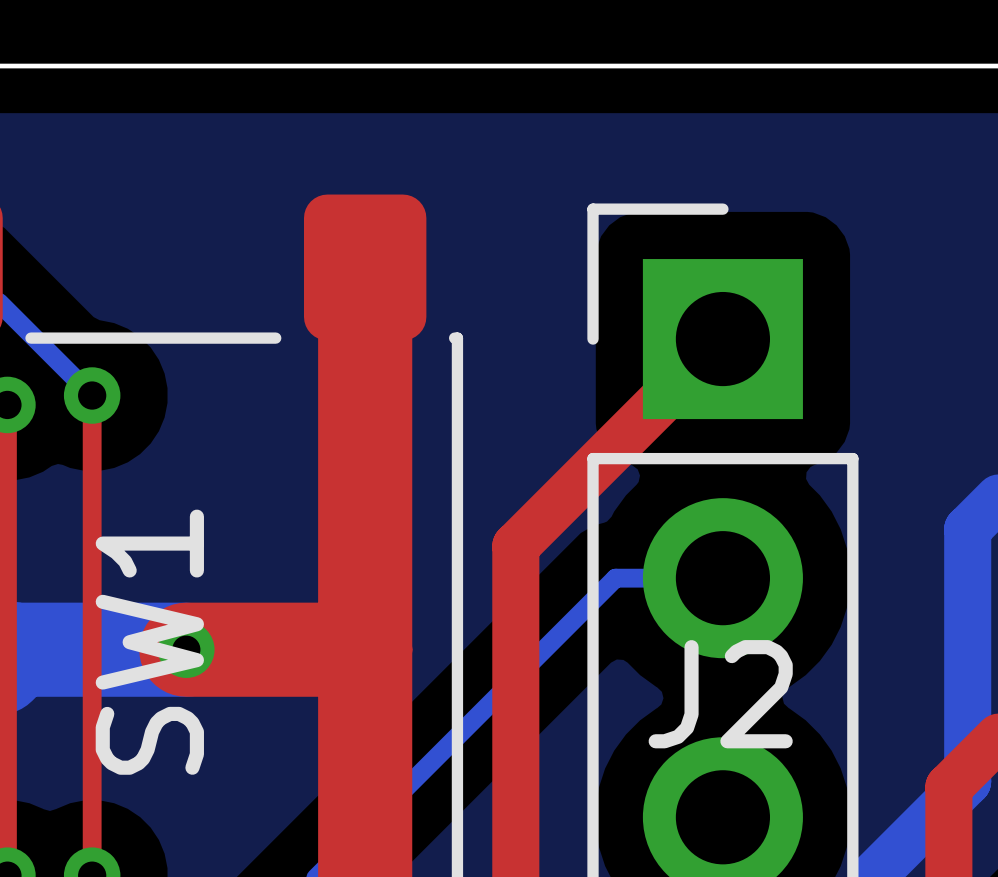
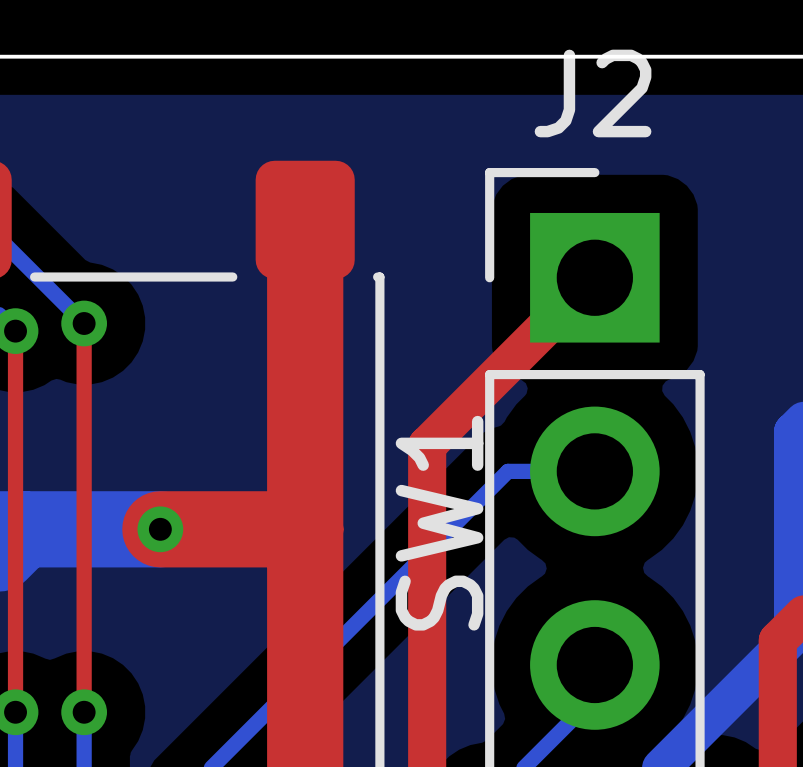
SW1 name position: SW1 (149, 642) -> SW1 (439, 523)
J2 name position: J2 (720, 694) -> J2 (593, 93)

